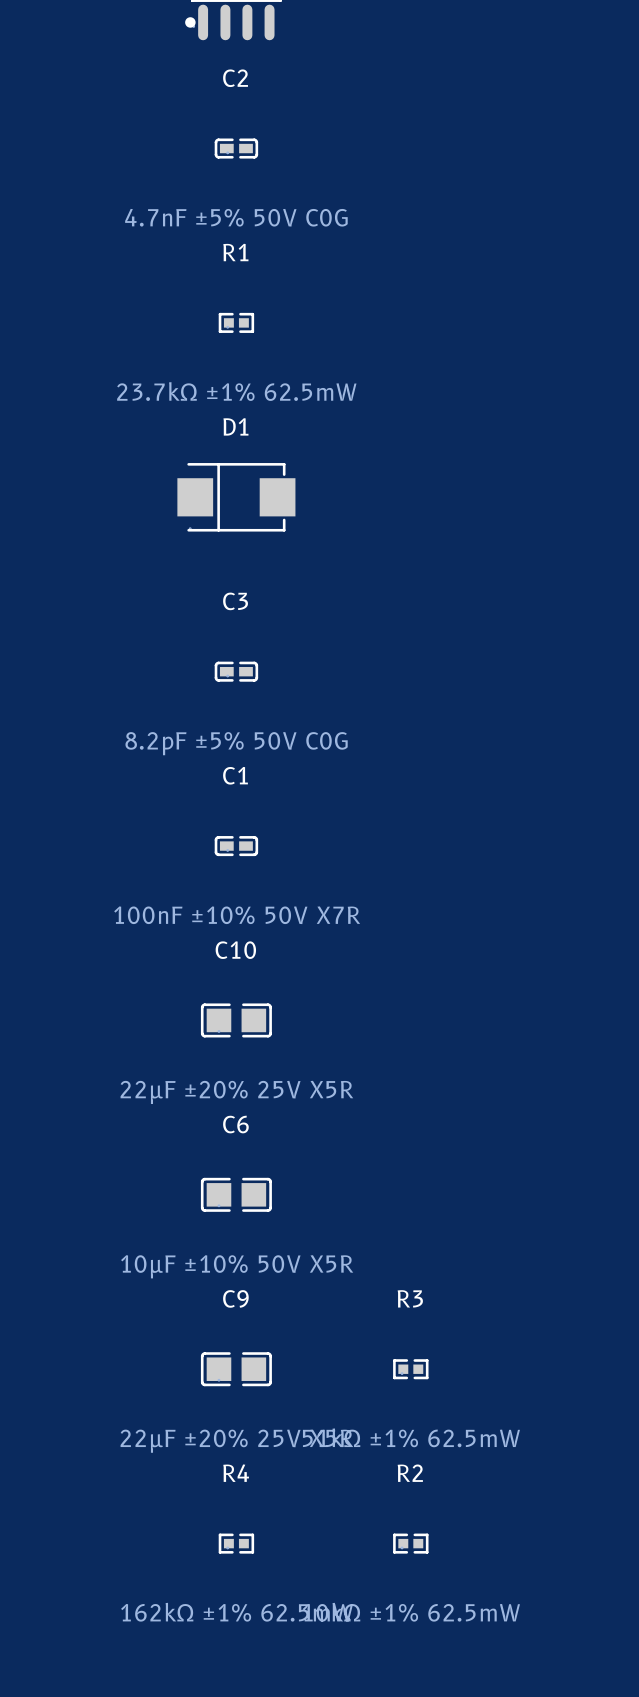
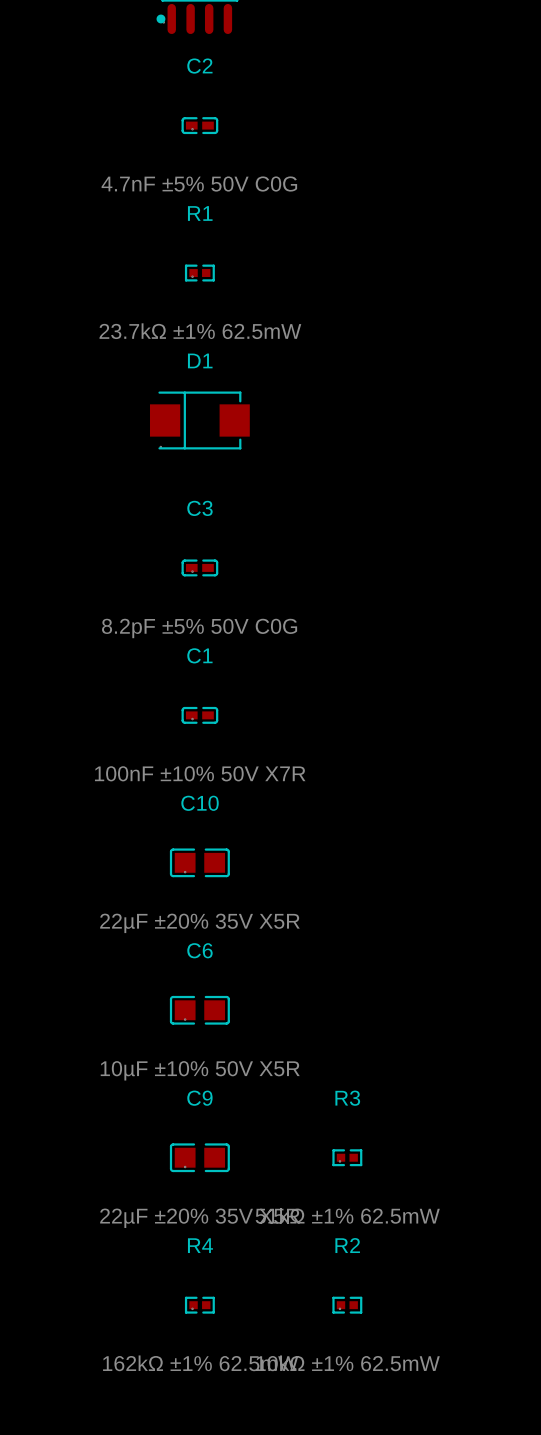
C10 value: 22µF ±20% 25V X5R (236, 1092) -> 22µF ±20% 35V X5R (199, 923)
C9 value: 22µF ±20% 25V X5R (236, 1441) -> 22µF ±20% 35V X5R (199, 1218)

